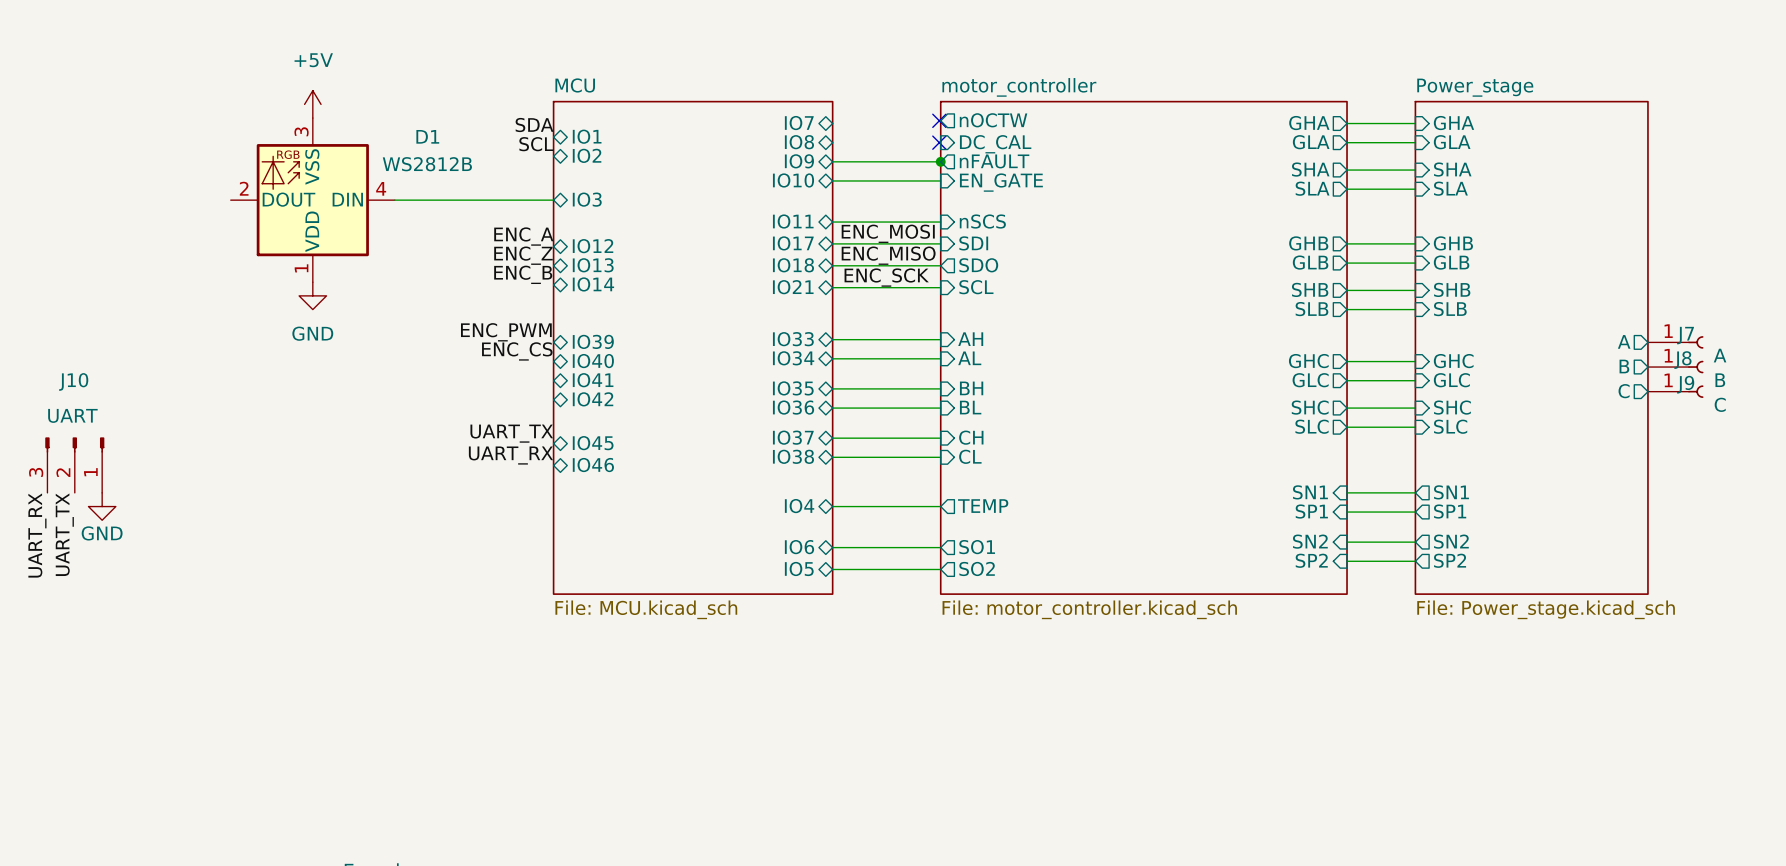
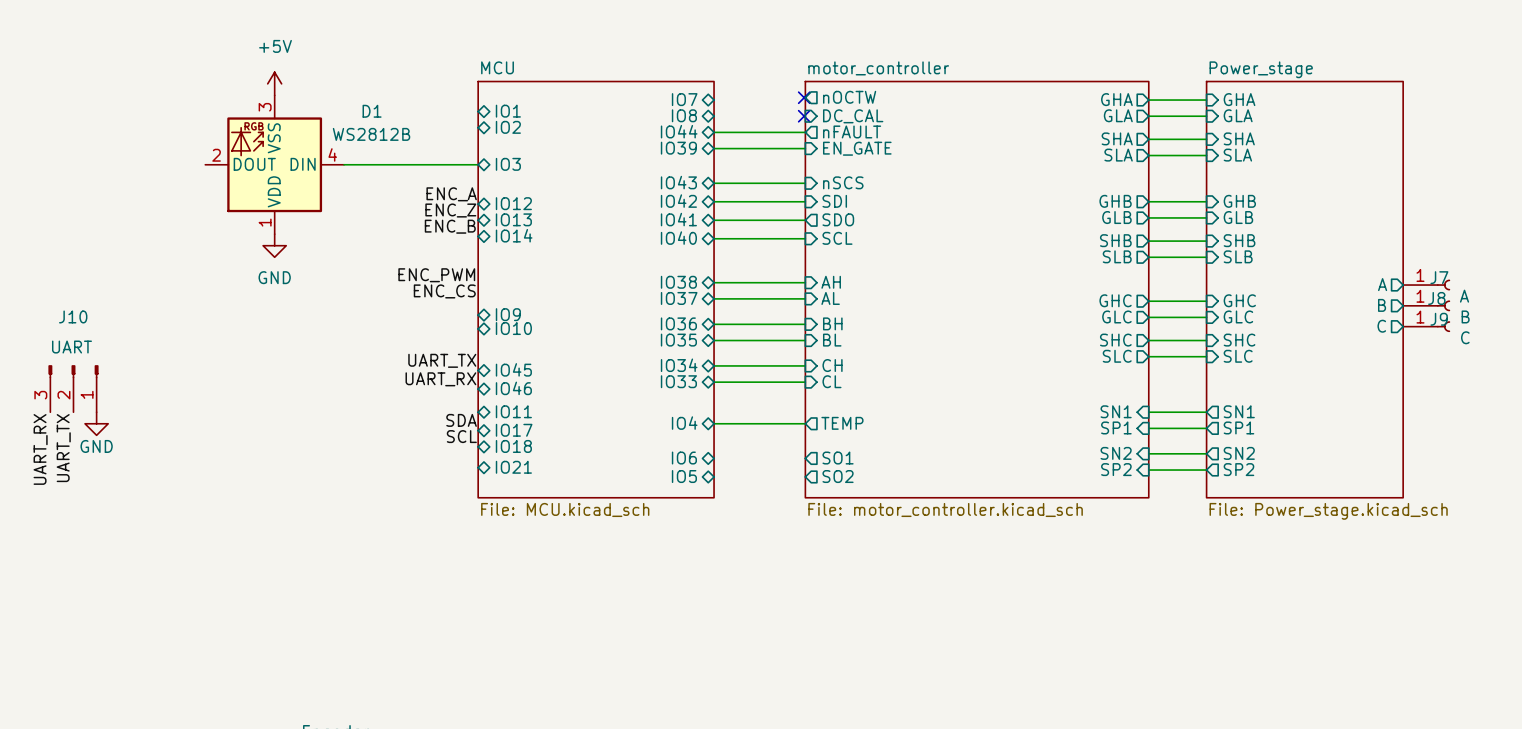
label: SDA (534, 125) -> none
label: SCL (536, 144) -> none
sheet pin: IO9 (799, 161) -> IO44 (679, 131)
junction: (940, 161) -> none
sheet pin: IO10 (793, 180) -> IO39 (678, 148)
sheet pin: IO11 (793, 221) -> IO43 (678, 182)
label: ENC_MOSI (888, 233) -> none
sheet pin: IO17 (793, 243) -> IO42 (678, 201)
label: ENC_MISO (888, 255) -> none
sheet pin: IO18 (793, 265) -> IO41 (678, 219)
label: ENC_SCK (886, 277) -> none
sheet pin: IO21 (793, 287) -> IO40 (678, 238)
sheet pin: IO33 (793, 339) -> IO38 (678, 282)
sheet pin: IO39 (593, 341) -> none
sheet pin: IO34 (793, 358) -> IO37 (679, 298)
sheet pin: IO40 (593, 361) -> none
sheet pin: IO41 (593, 380) -> IO9 (508, 314)
sheet pin: IO35 (793, 388) -> IO36 (678, 323)
sheet pin: IO42 (593, 399) -> IO10 (513, 328)
sheet pin: IO36 (793, 407) -> IO35 (678, 340)
sheet pin: IO37 (793, 437) -> IO34 (679, 365)
sheet pin: IO38 (793, 456) -> IO33 (678, 381)
sheet pin: none -> IO11 (513, 411)
label: none -> SDA (461, 420)
sheet pin: none -> IO17 (514, 430)
label: none -> SCL (461, 436)
sheet pin: none -> IO18 (513, 446)
wire: (832, 547) (940, 547) -> none
sheet pin: none -> IO21 (513, 467)
wire: (832, 569) (940, 569) -> none

